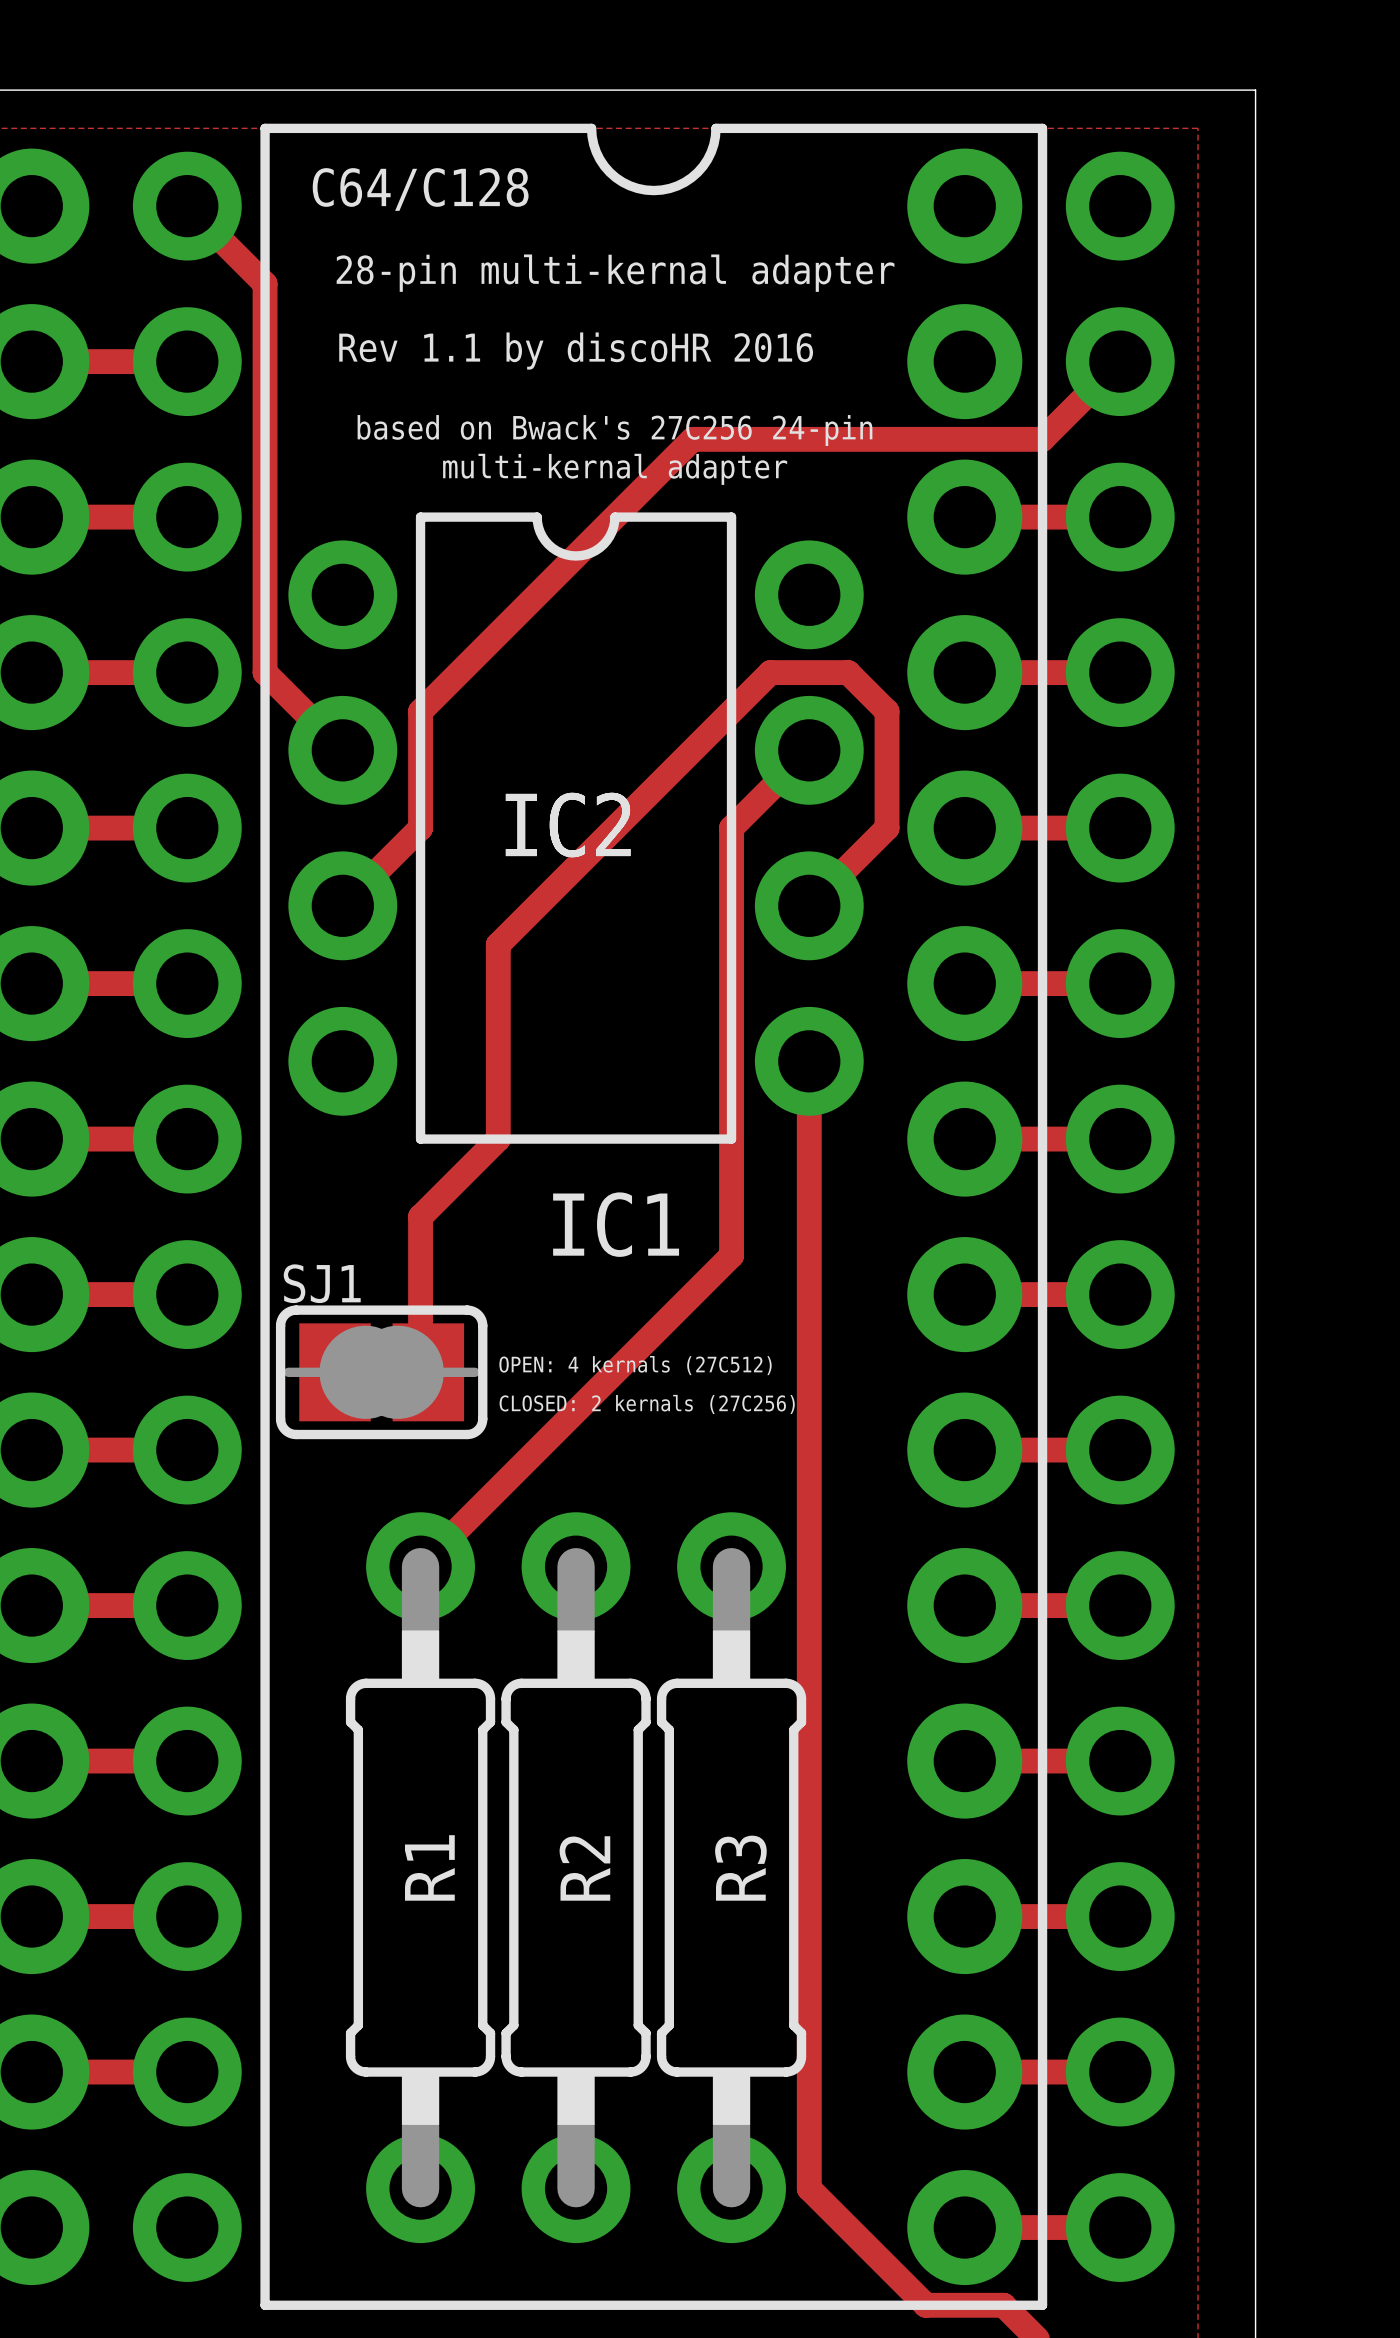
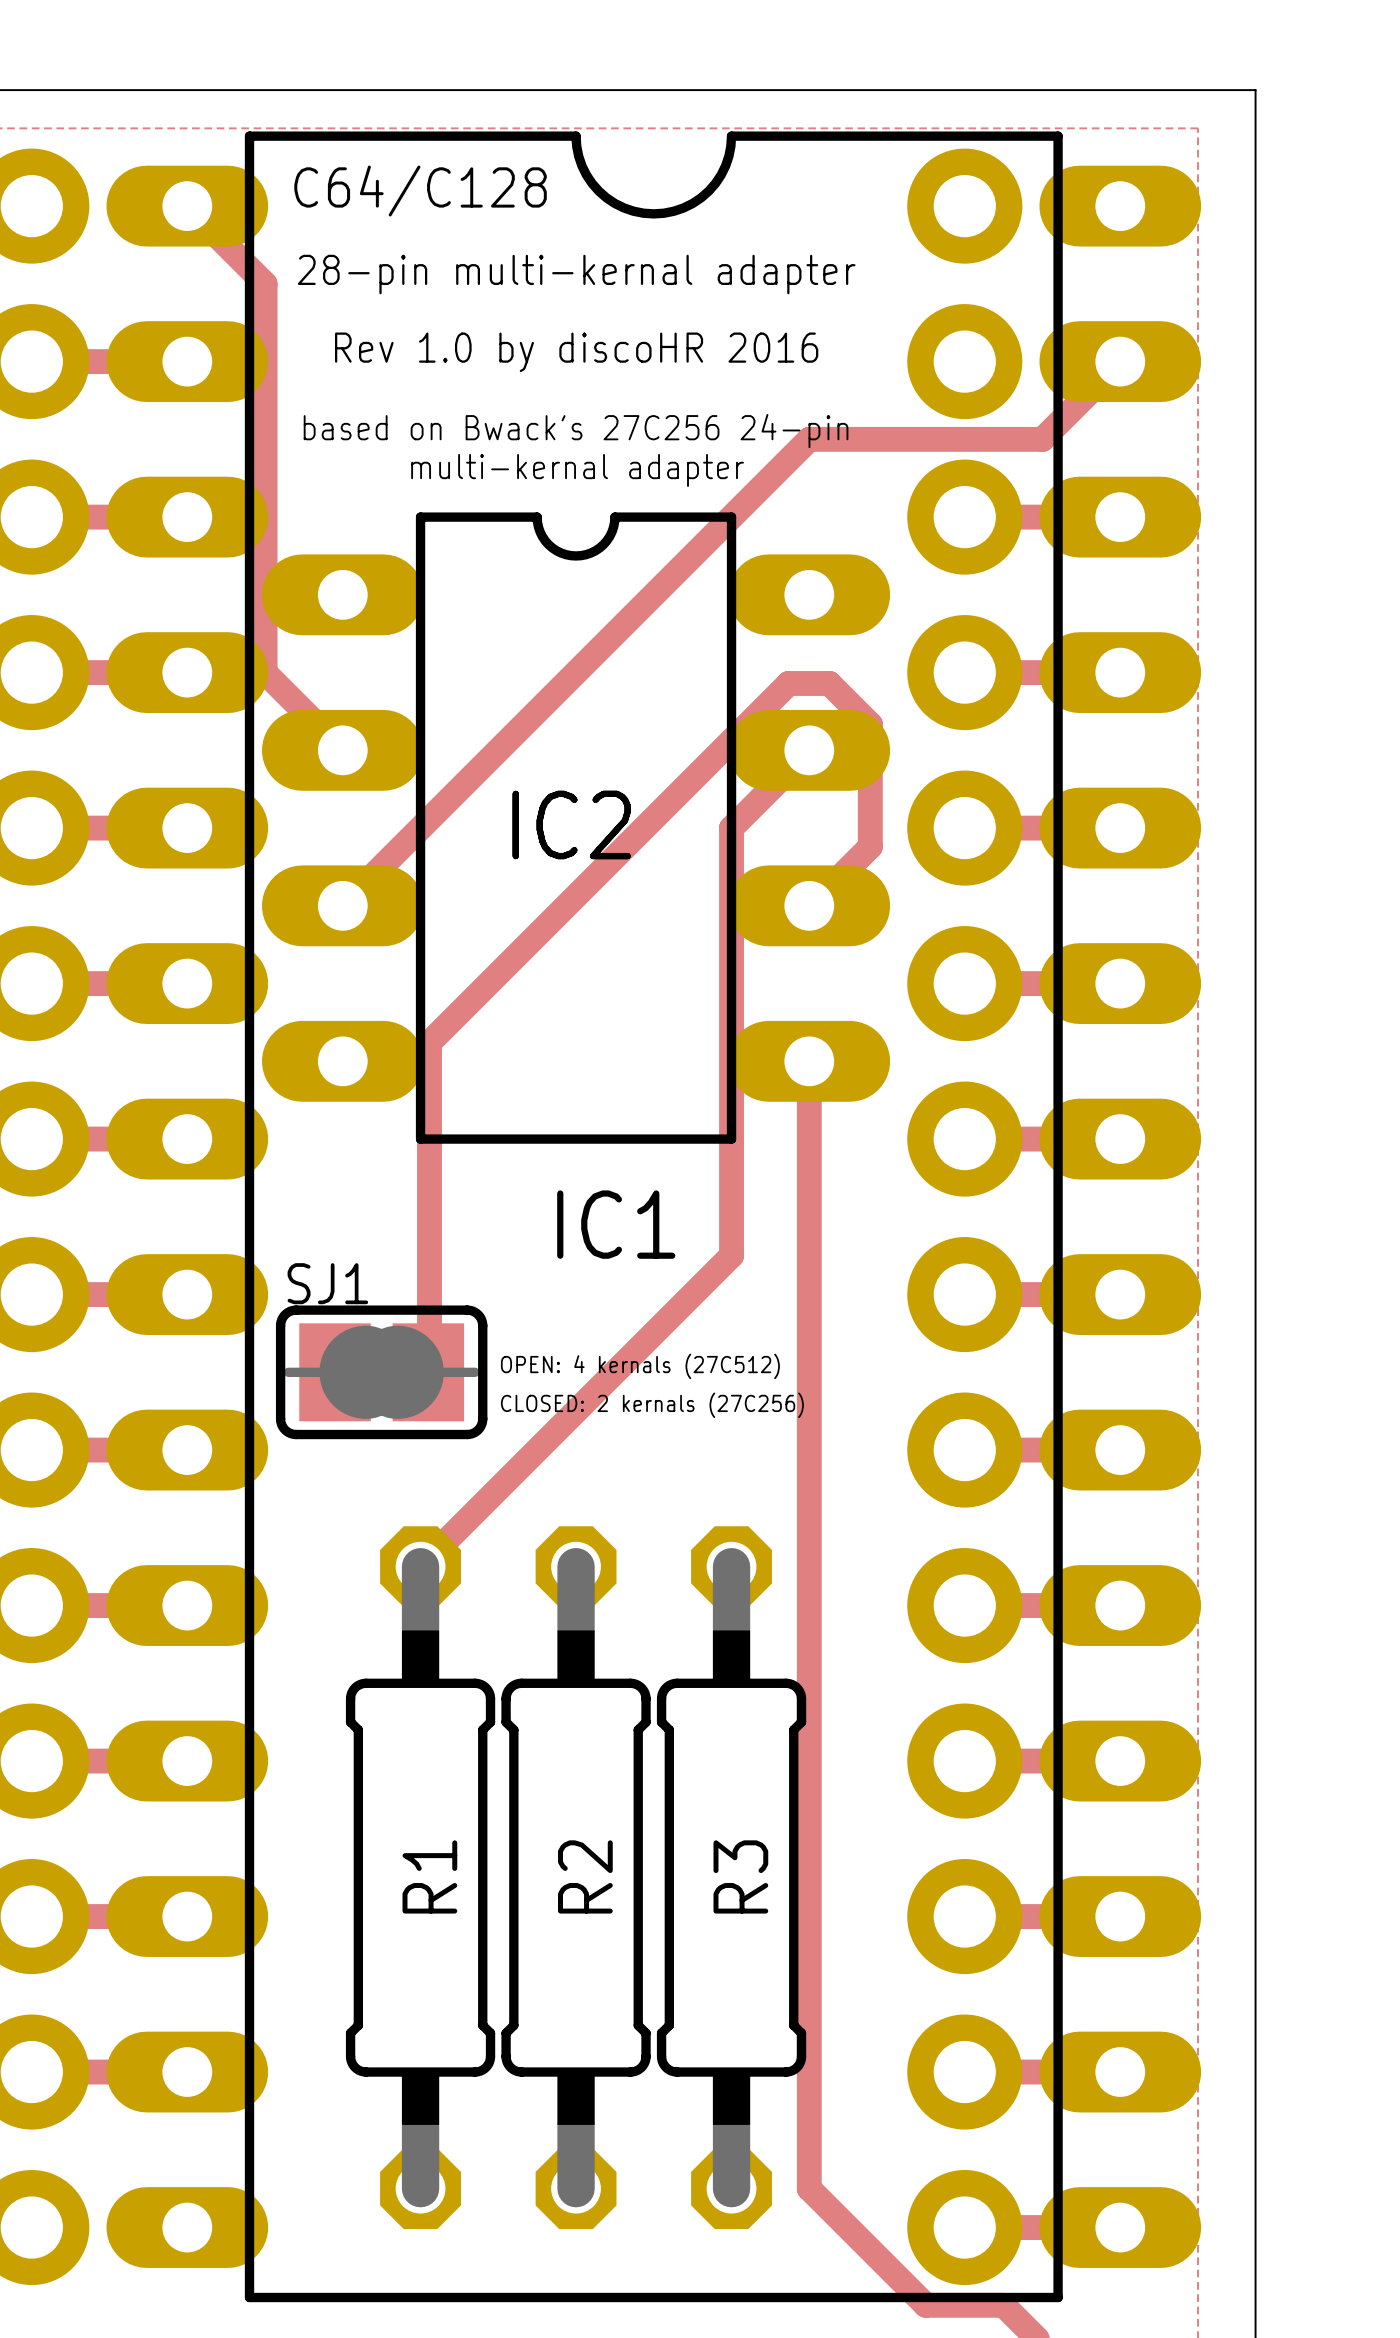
IC1 footprint: [132, 123, 1175, 2310] -> [106, 131, 1202, 2303]
text position: 28-pin multi-kernal adapter (615, 273) -> 28-pin multi-kernal adapter (576, 274)
text: Rev 1.1 by discoHR 2016 (576, 351) -> Rev 1.0 by discoHR 2016 (576, 352)
text position: based on Bwack's 27C256 24-pin (614, 430) -> based on Bwack's 27C256 24-pin (576, 431)
track: (809, 439) (692, 439) (420, 711) (420, 828) -> (809, 439) (420, 828)
text position: multi-kernal adapter (615, 469) -> multi-kernal adapter (577, 470)
part footprint: [288, 512, 864, 1144] -> [261, 512, 891, 1144]
track: (809, 905) (887, 828) (887, 711) (848, 672) (770, 672) (498, 944) (498, 1139) (420, 1216) (420, 1364) (428, 1372) -> (809, 905) (870, 846) (870, 724) (829, 683) (788, 683) (429, 1042) (428, 1372)
R1 footprint: [345, 1512, 496, 2244] -> [345, 1526, 496, 2230]
R2 footprint: [501, 1512, 651, 2244] -> [501, 1526, 651, 2230]
R3 footprint: [656, 1512, 807, 2244] -> [656, 1526, 807, 2230]

